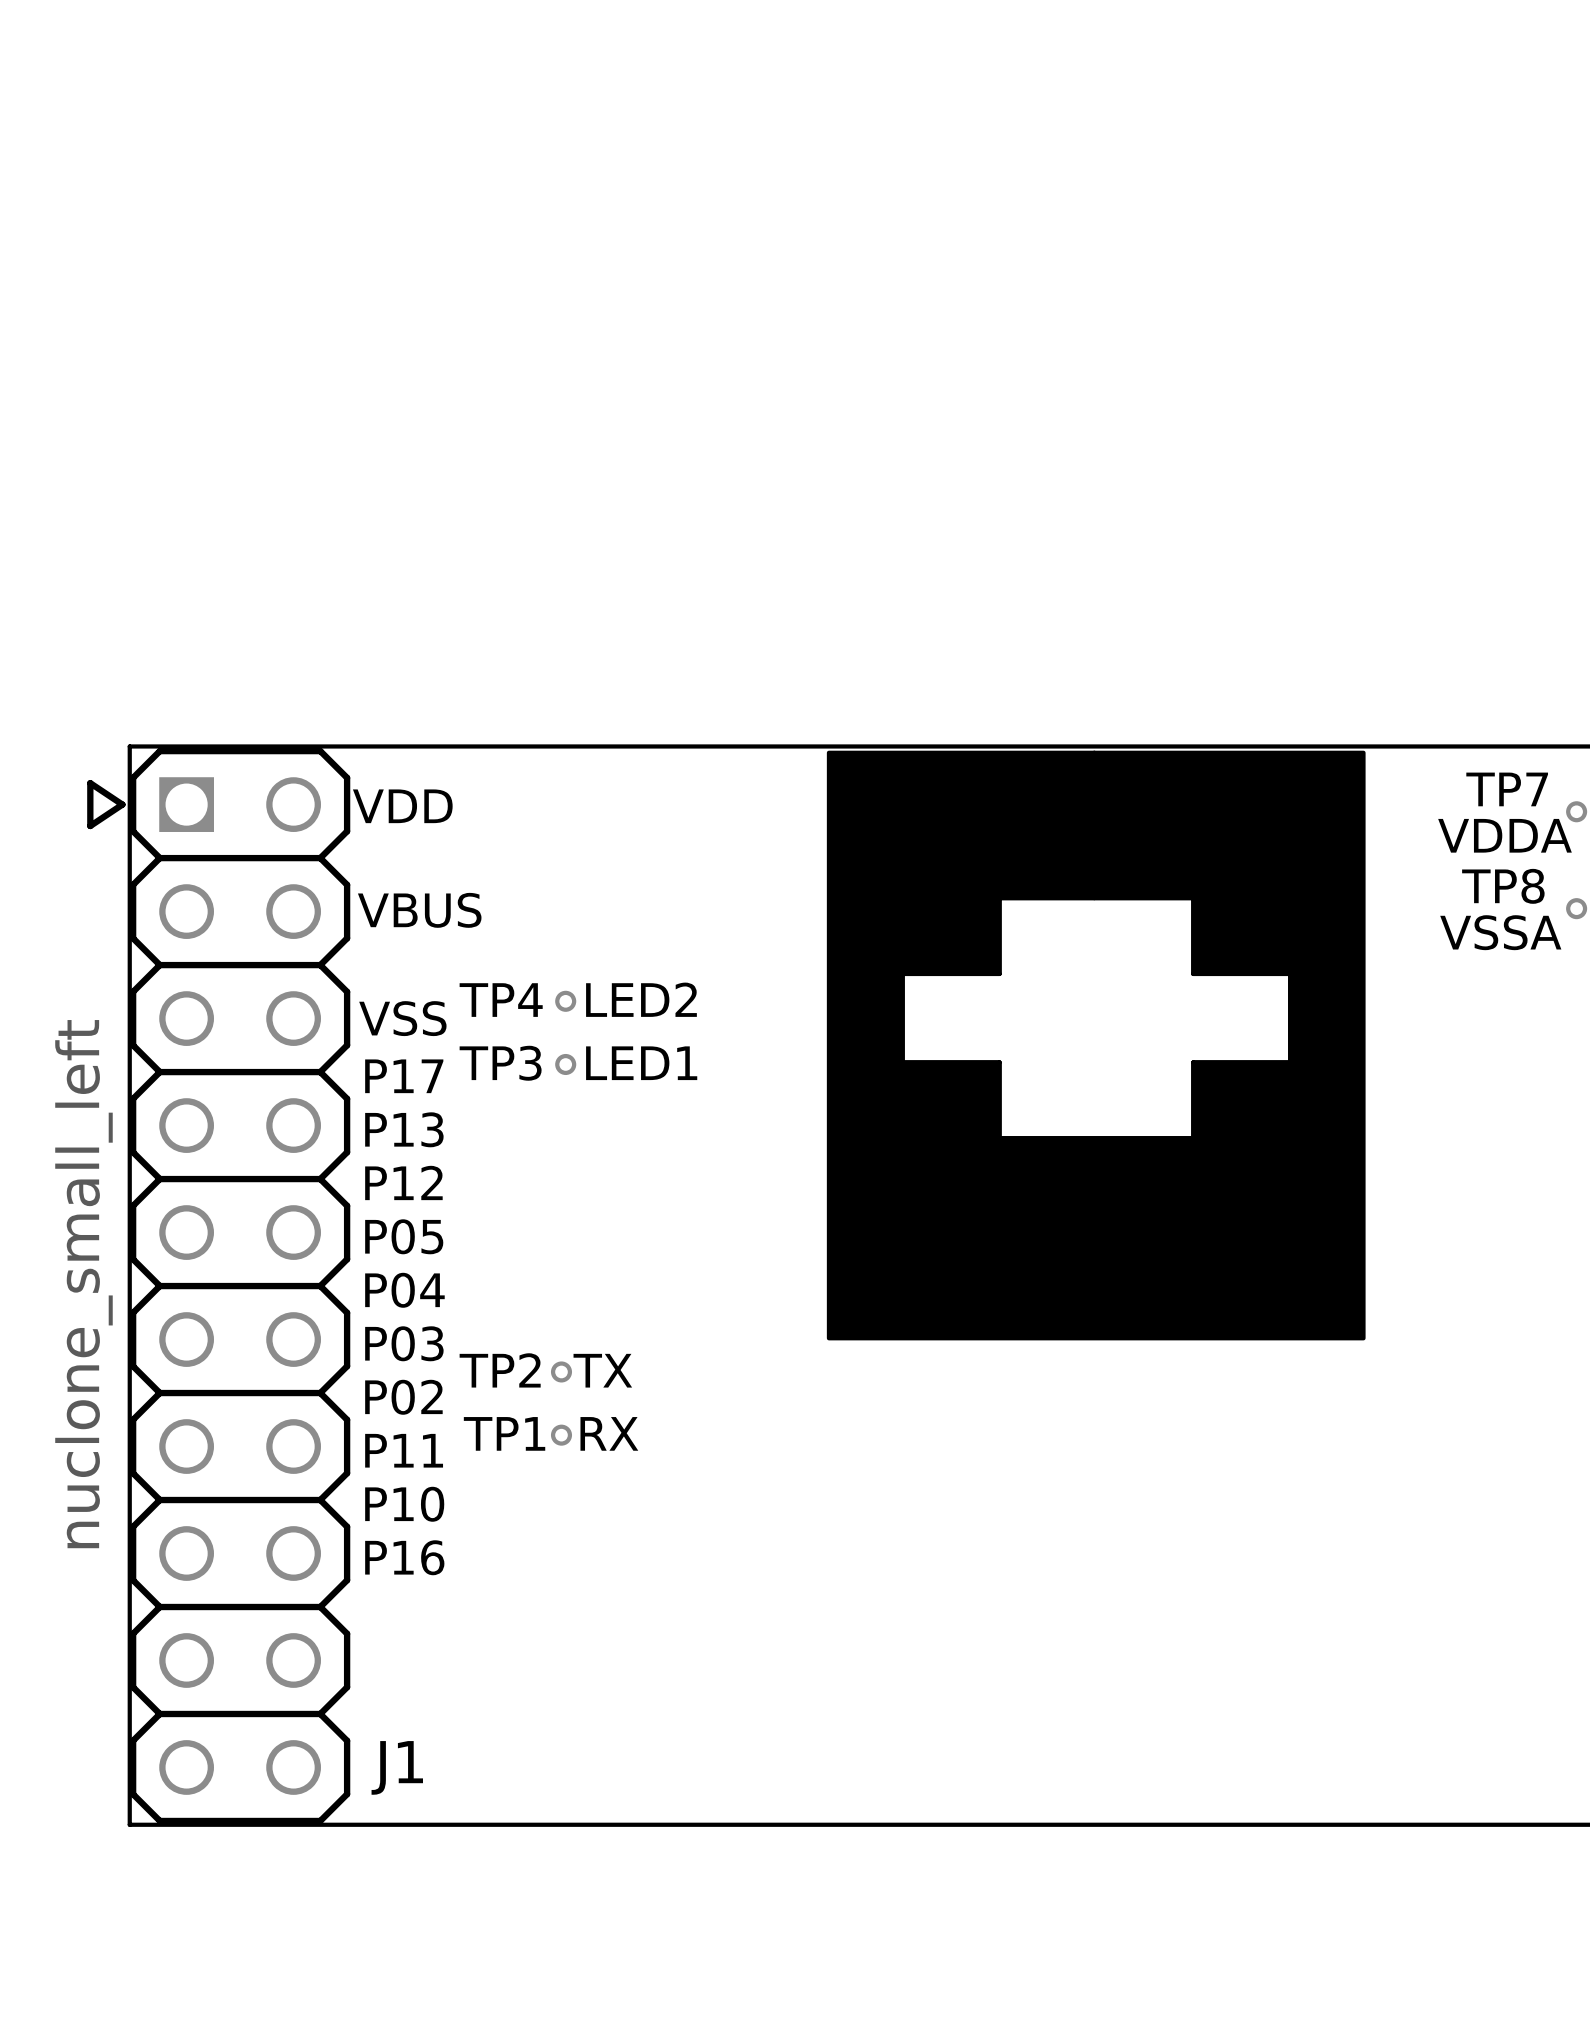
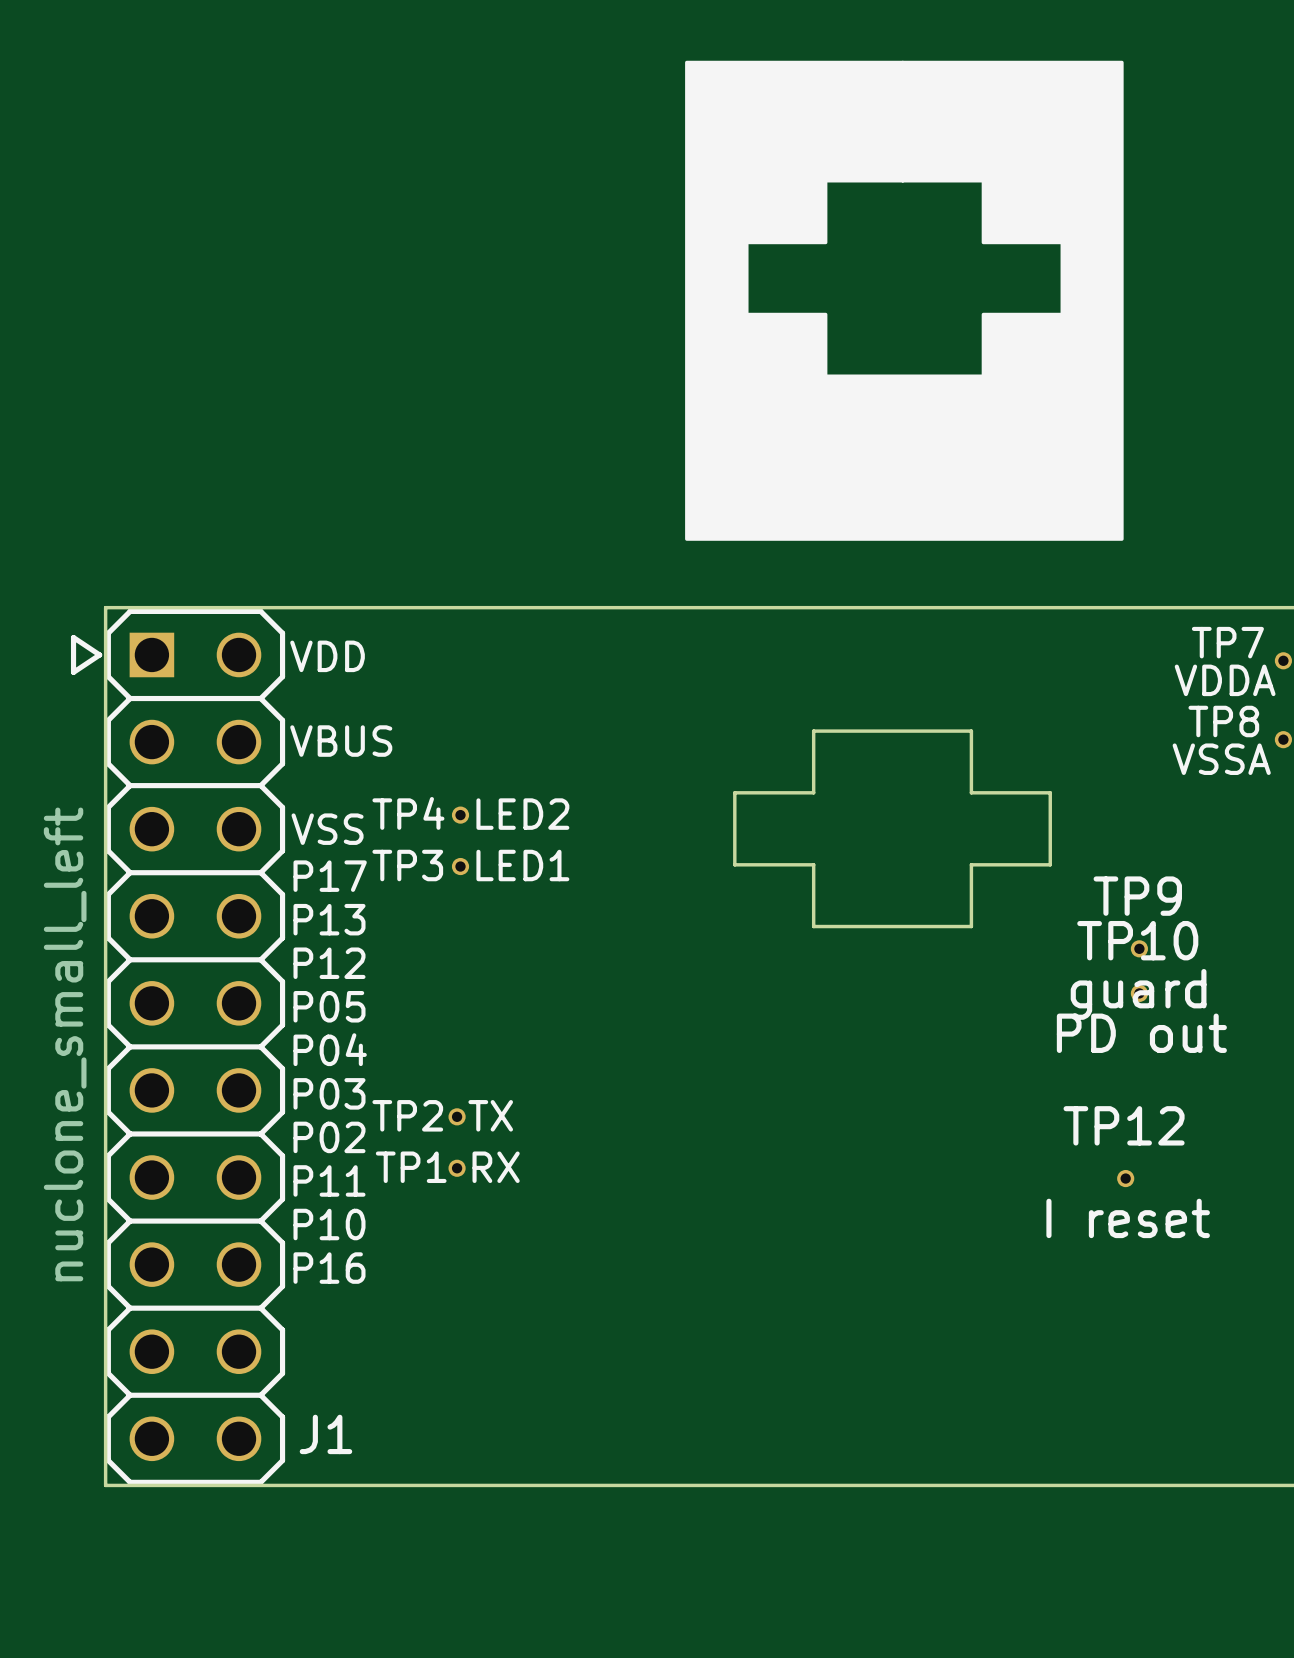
drawing position: (1096, 1045) -> (904, 300)
TP9: none -> guard (1139, 948)
TP10: none -> PD out (1139, 993)
TP12: none -> I reset (1125, 1178)

